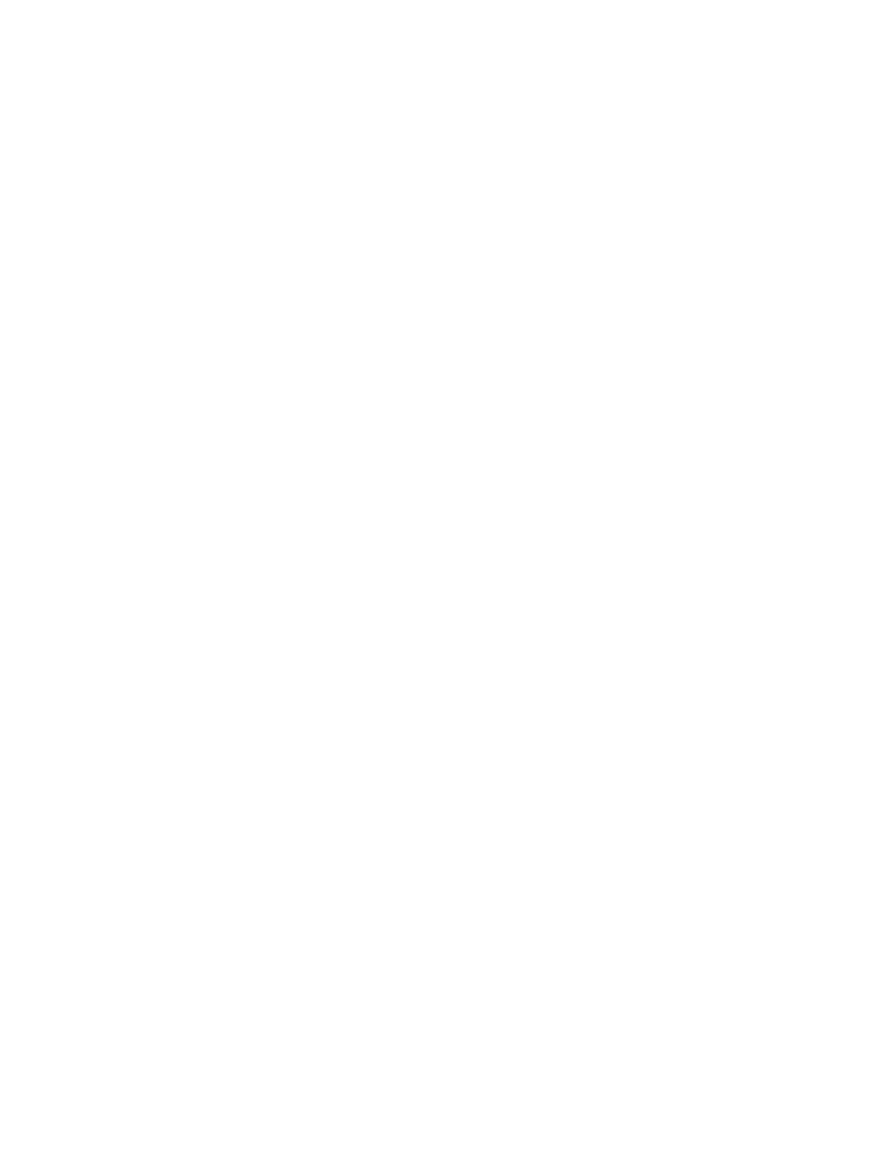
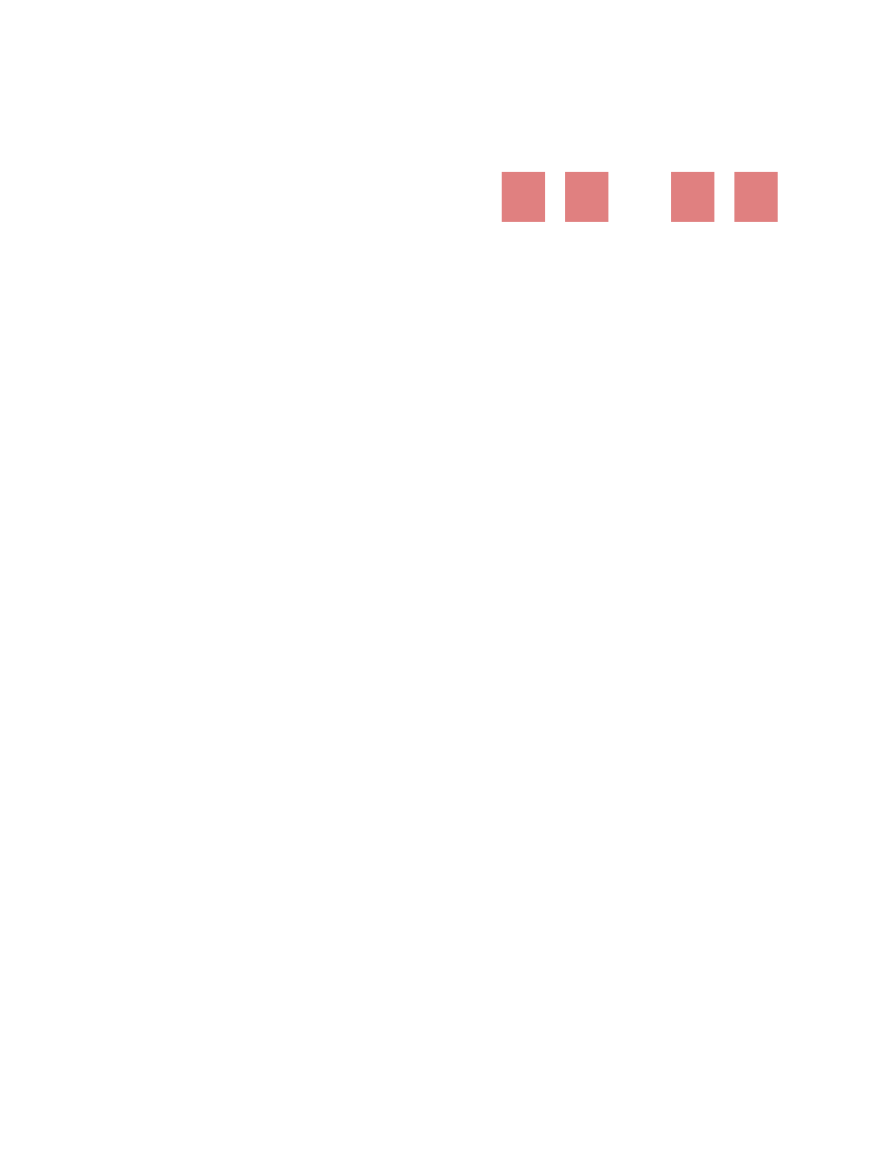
part: none -> (555, 196)
part: none -> (724, 196)

